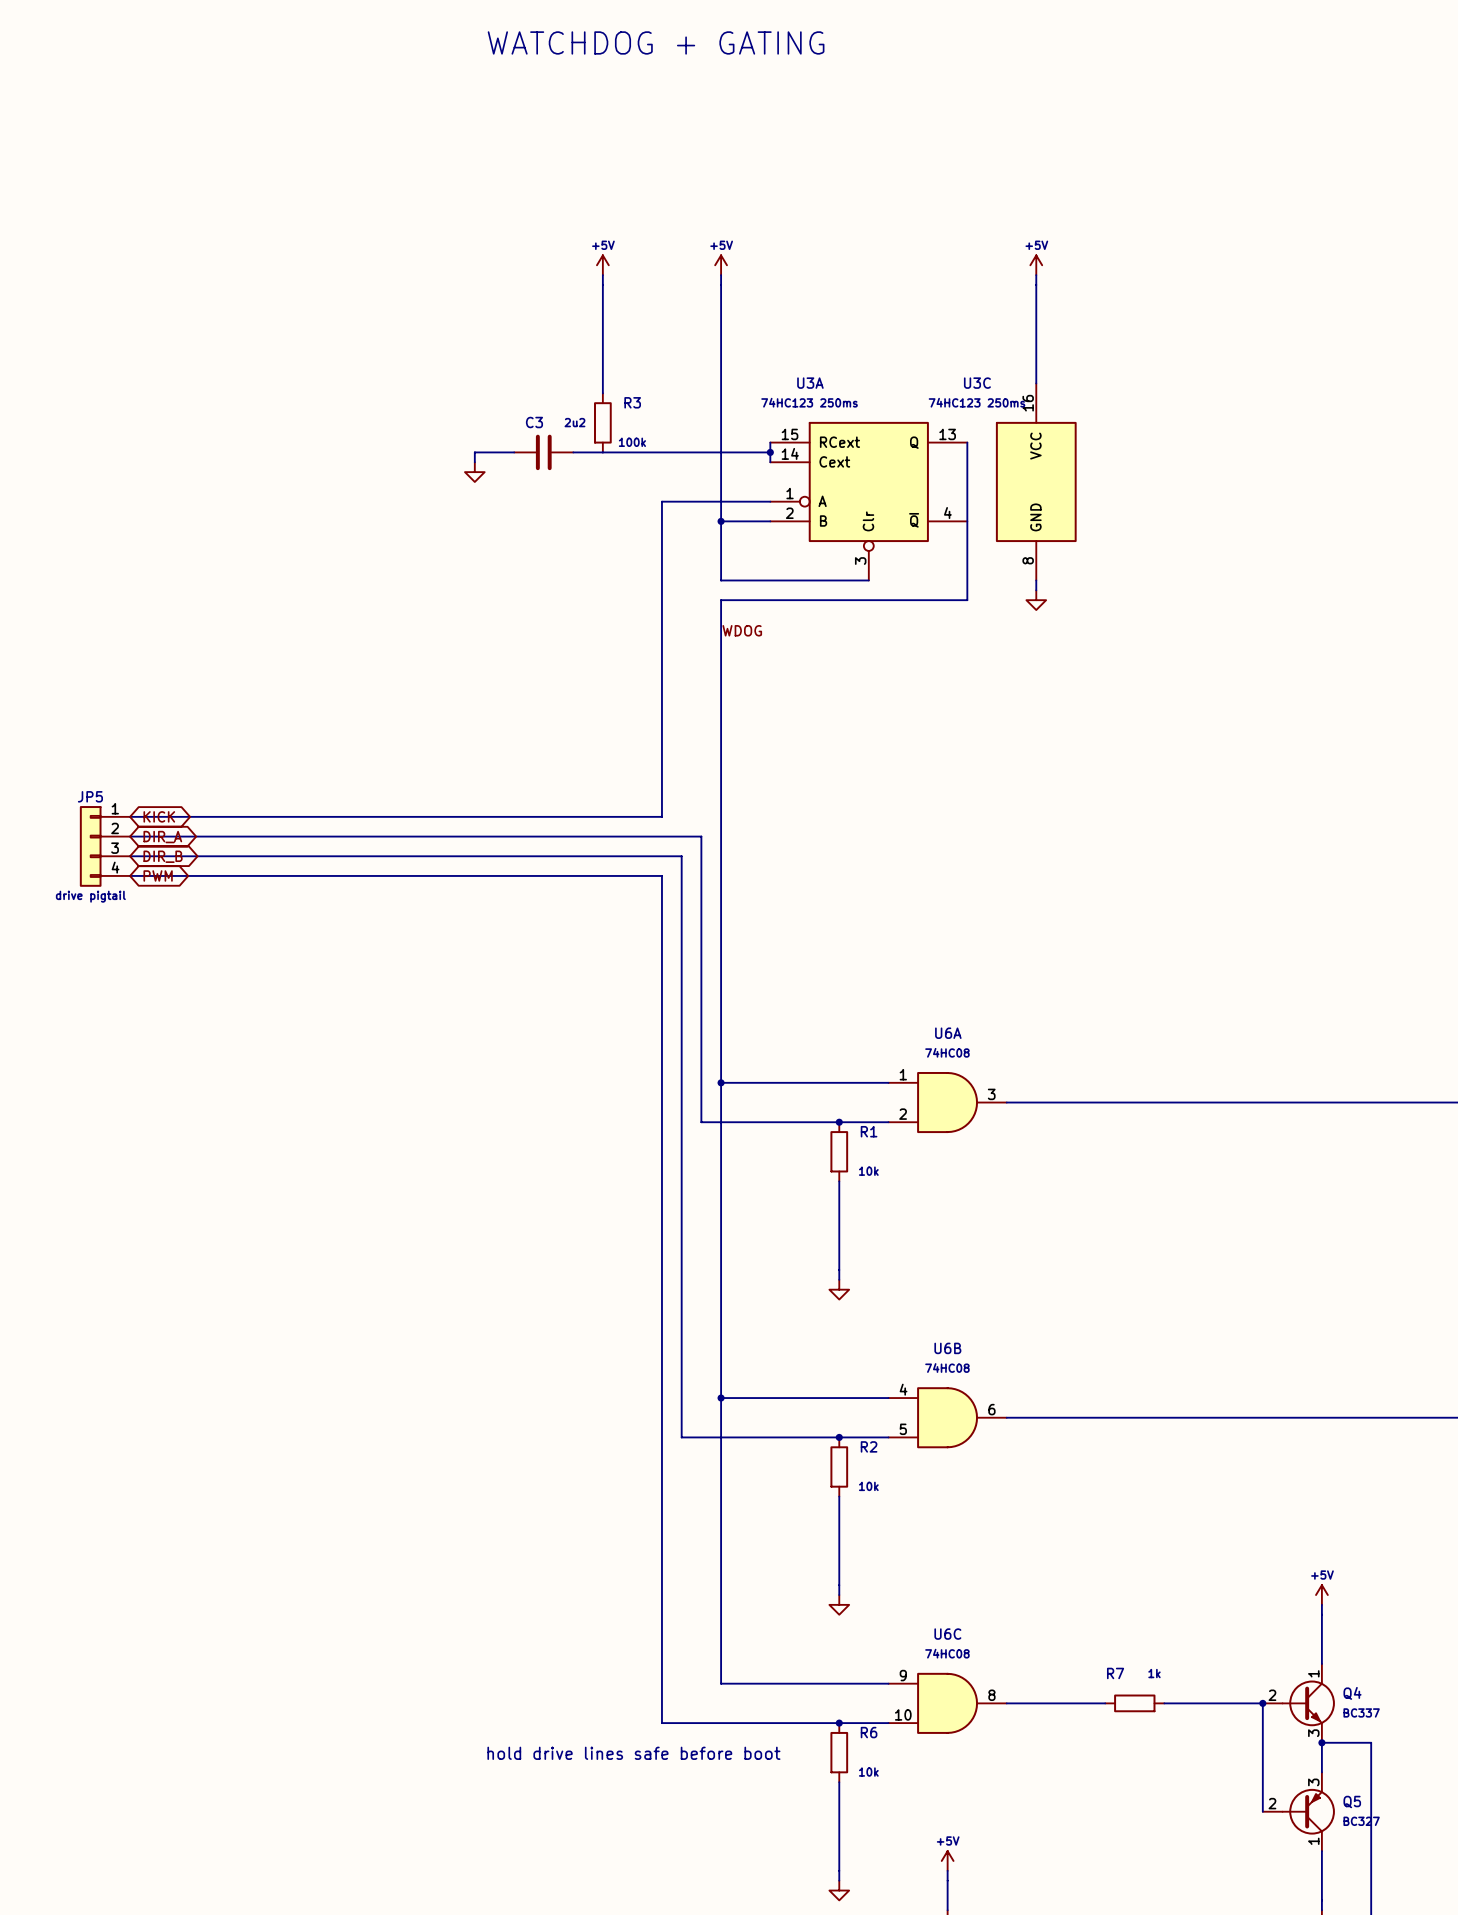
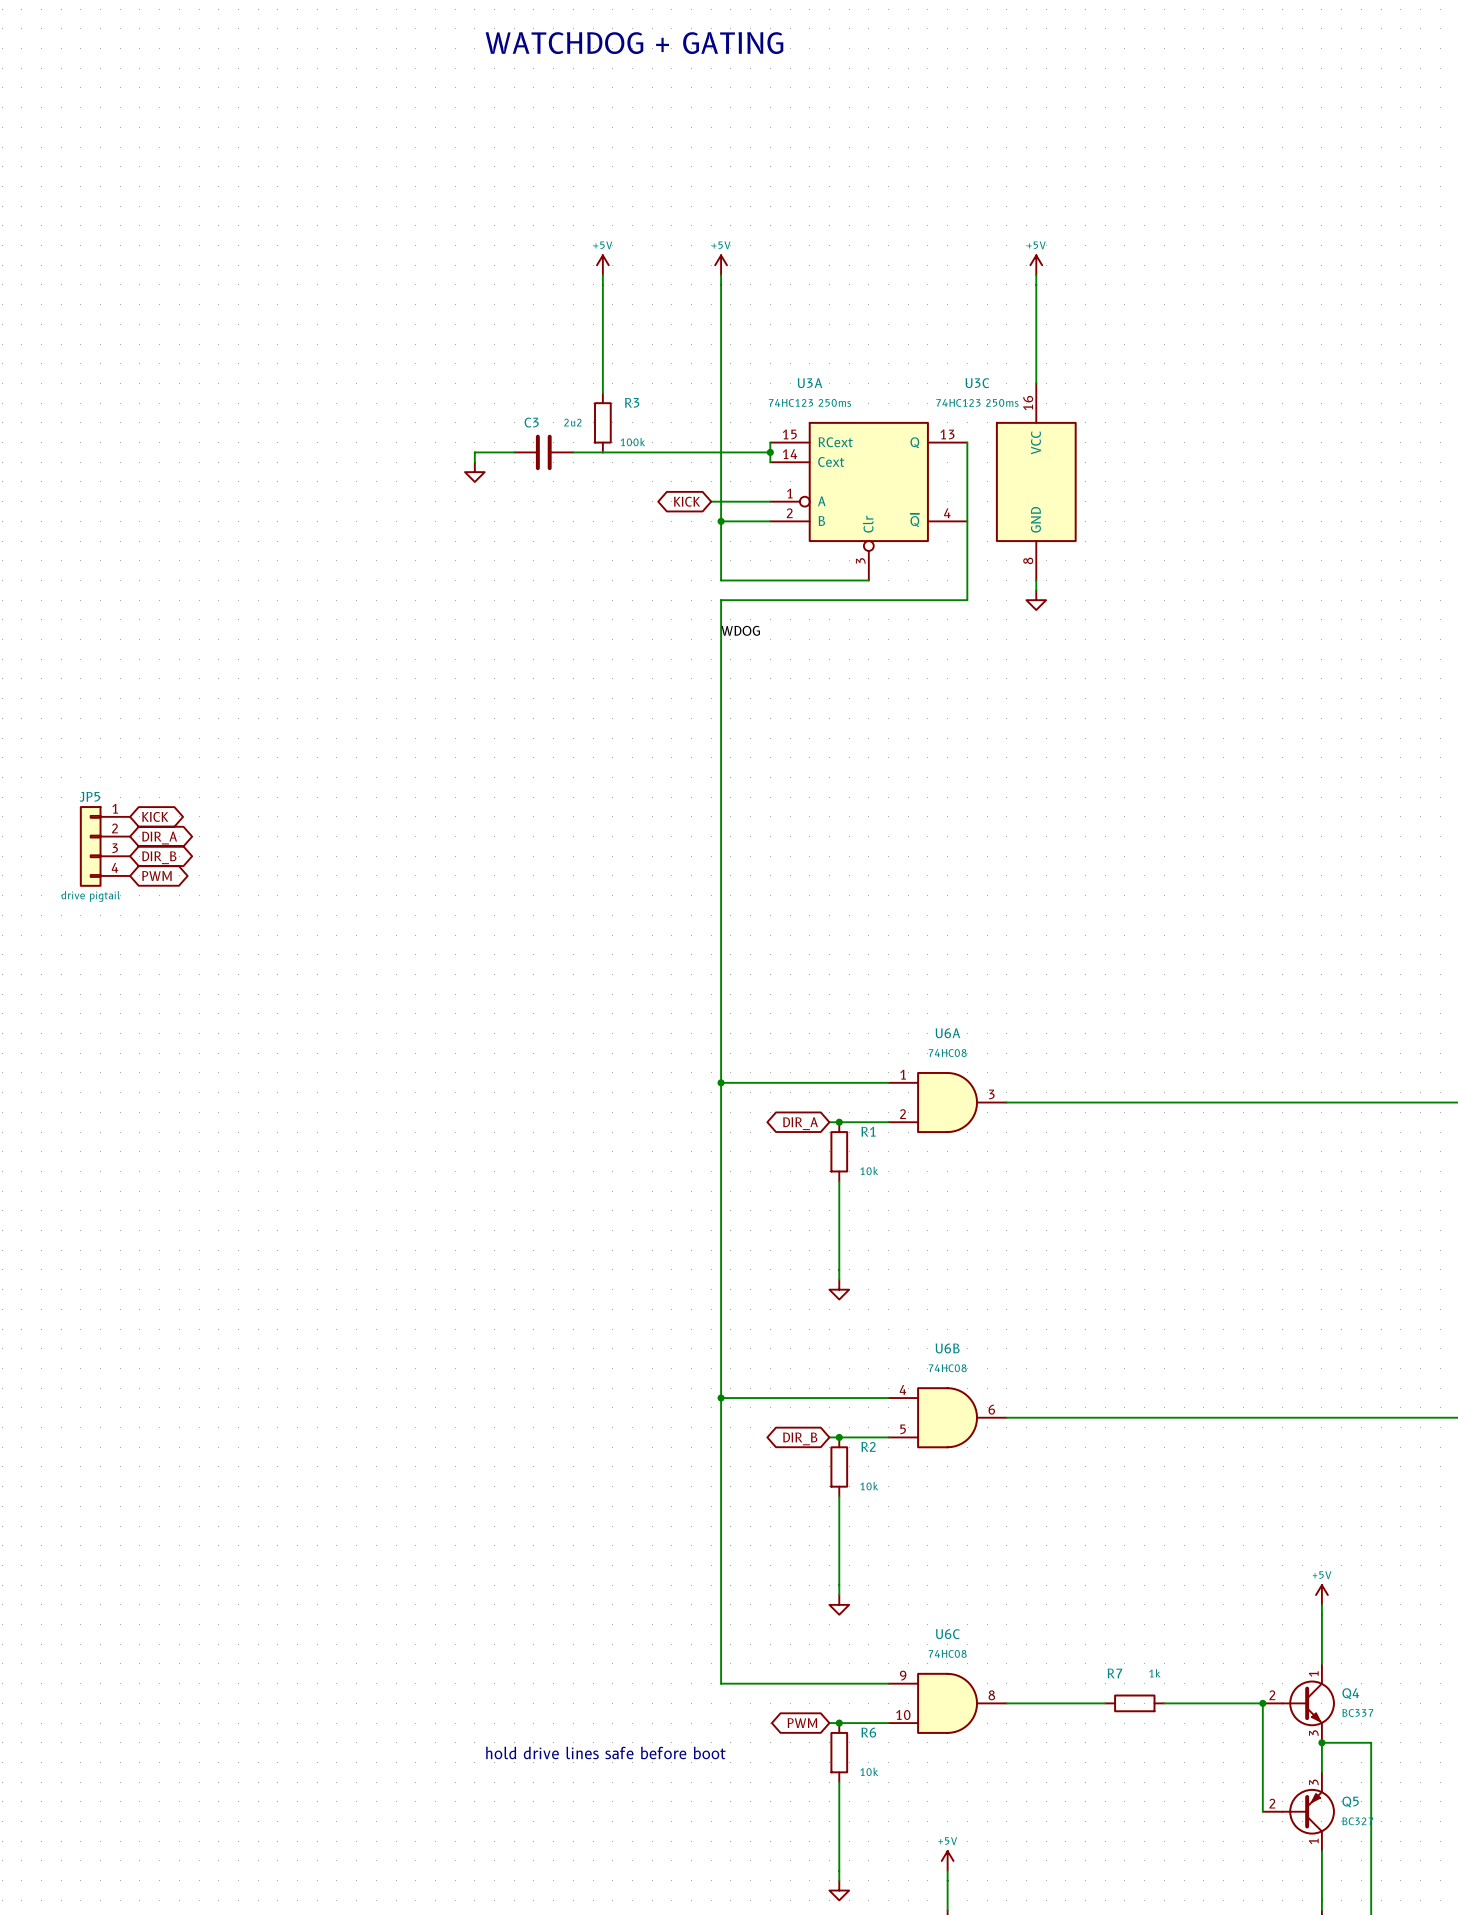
global label: none -> KICK (687, 501)
wire: (711, 501) (661, 501) (661, 816) (130, 816) -> none
wire: (130, 836) (701, 836) (701, 1122) (829, 1122) -> none
wire: (130, 856) (681, 856) (681, 1437) (829, 1437) -> none
wire: (130, 875) (661, 875) (661, 1723) (829, 1723) -> none
global label: none -> DIR_A (800, 1123)
global label: none -> DIR_B (800, 1438)
global label: none -> PWM (802, 1723)

